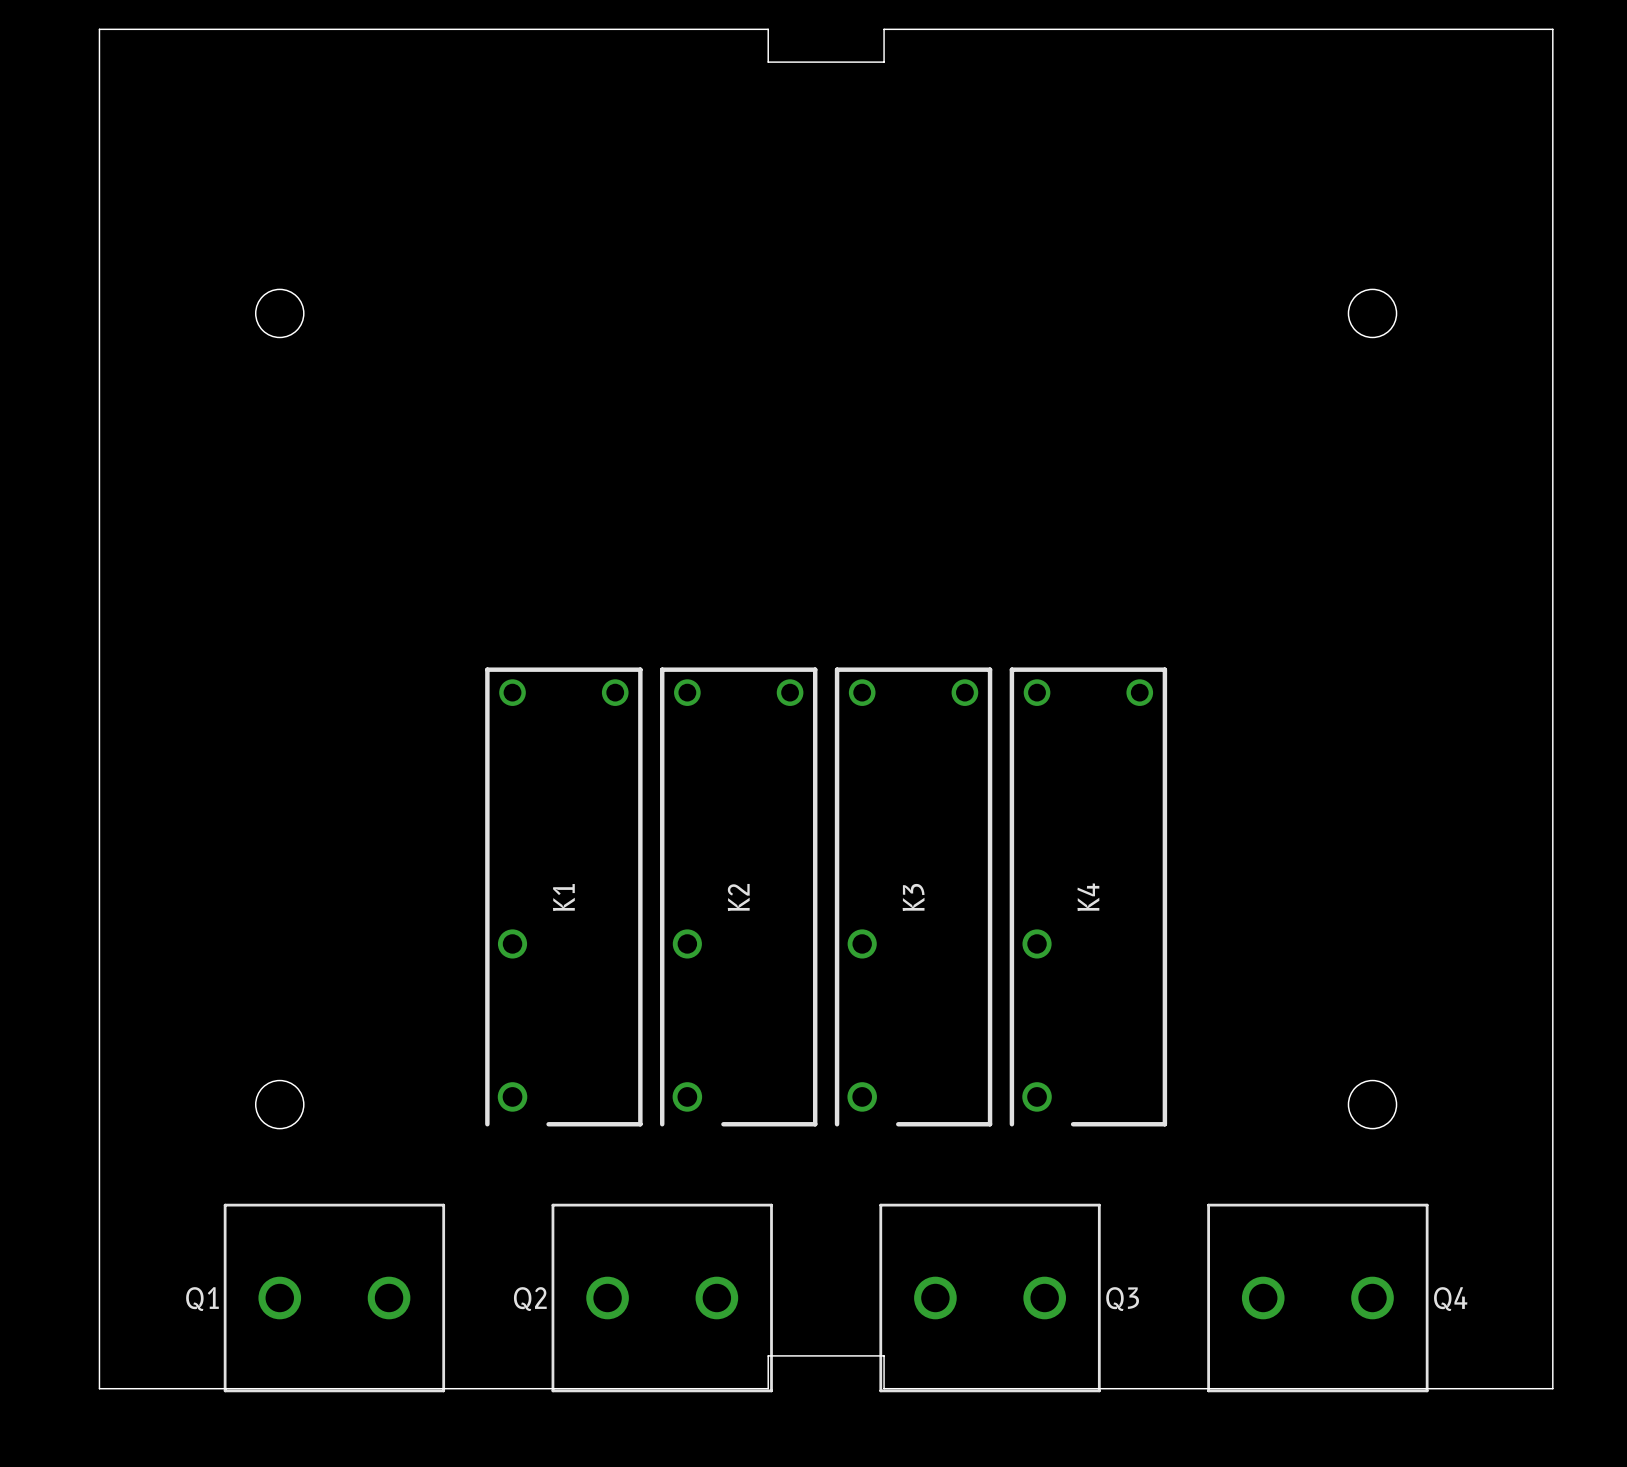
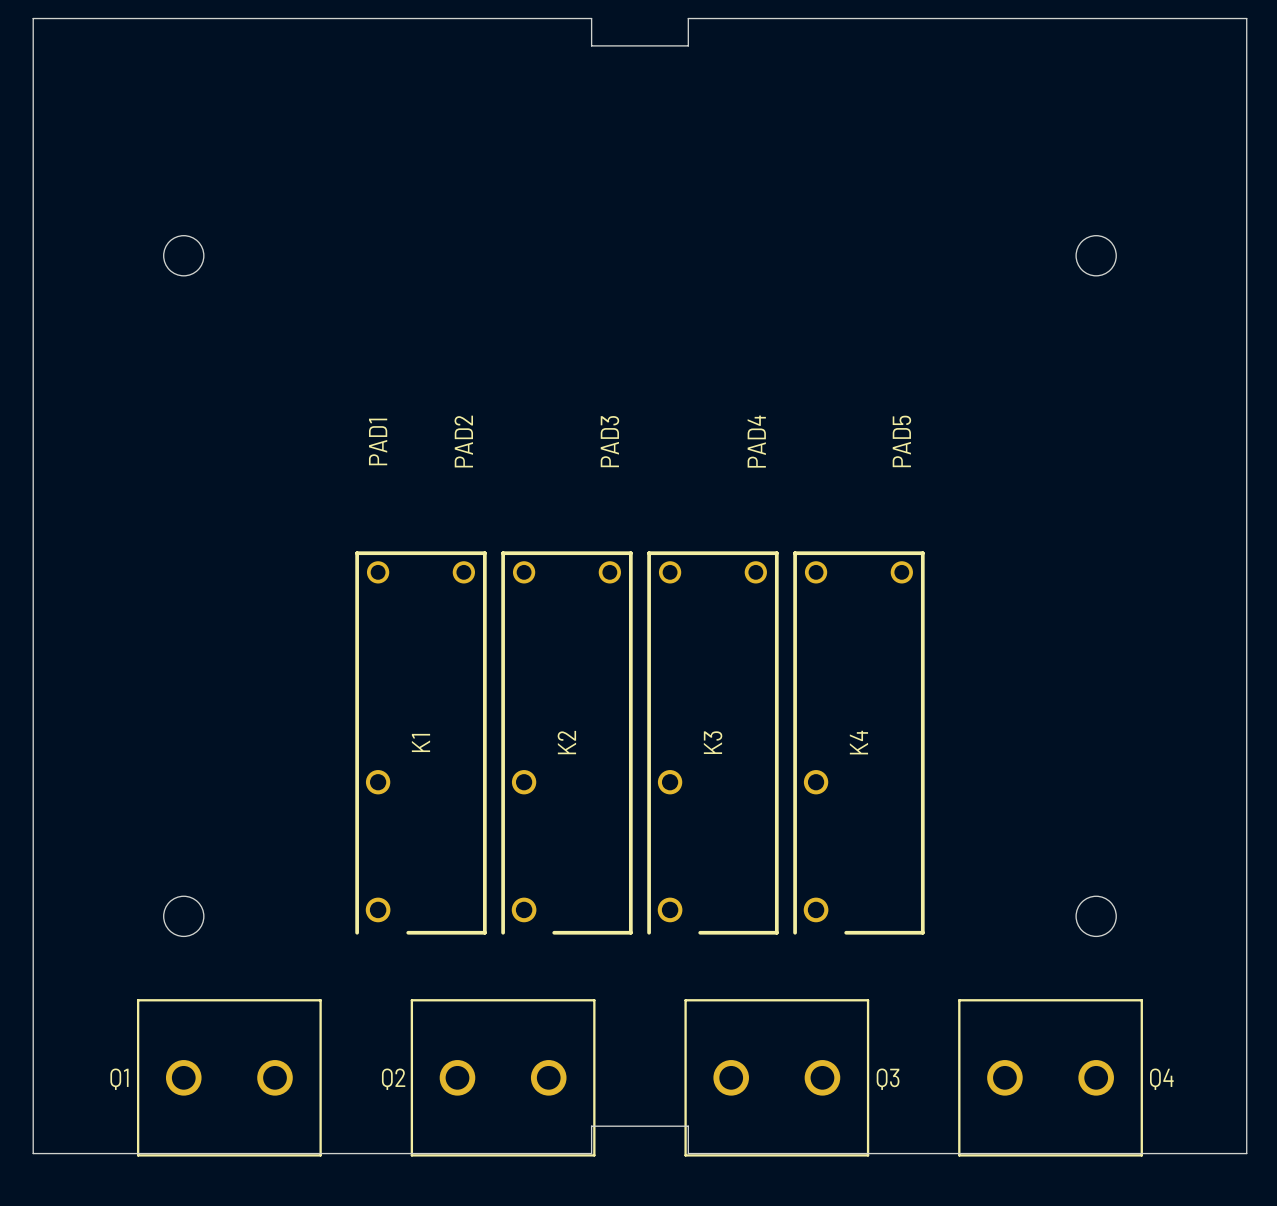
PAD1: none -> (378, 441)
PAD2: none -> (463, 441)
PAD3: none -> (609, 441)
PAD4: none -> (756, 441)
PAD5: none -> (901, 441)

